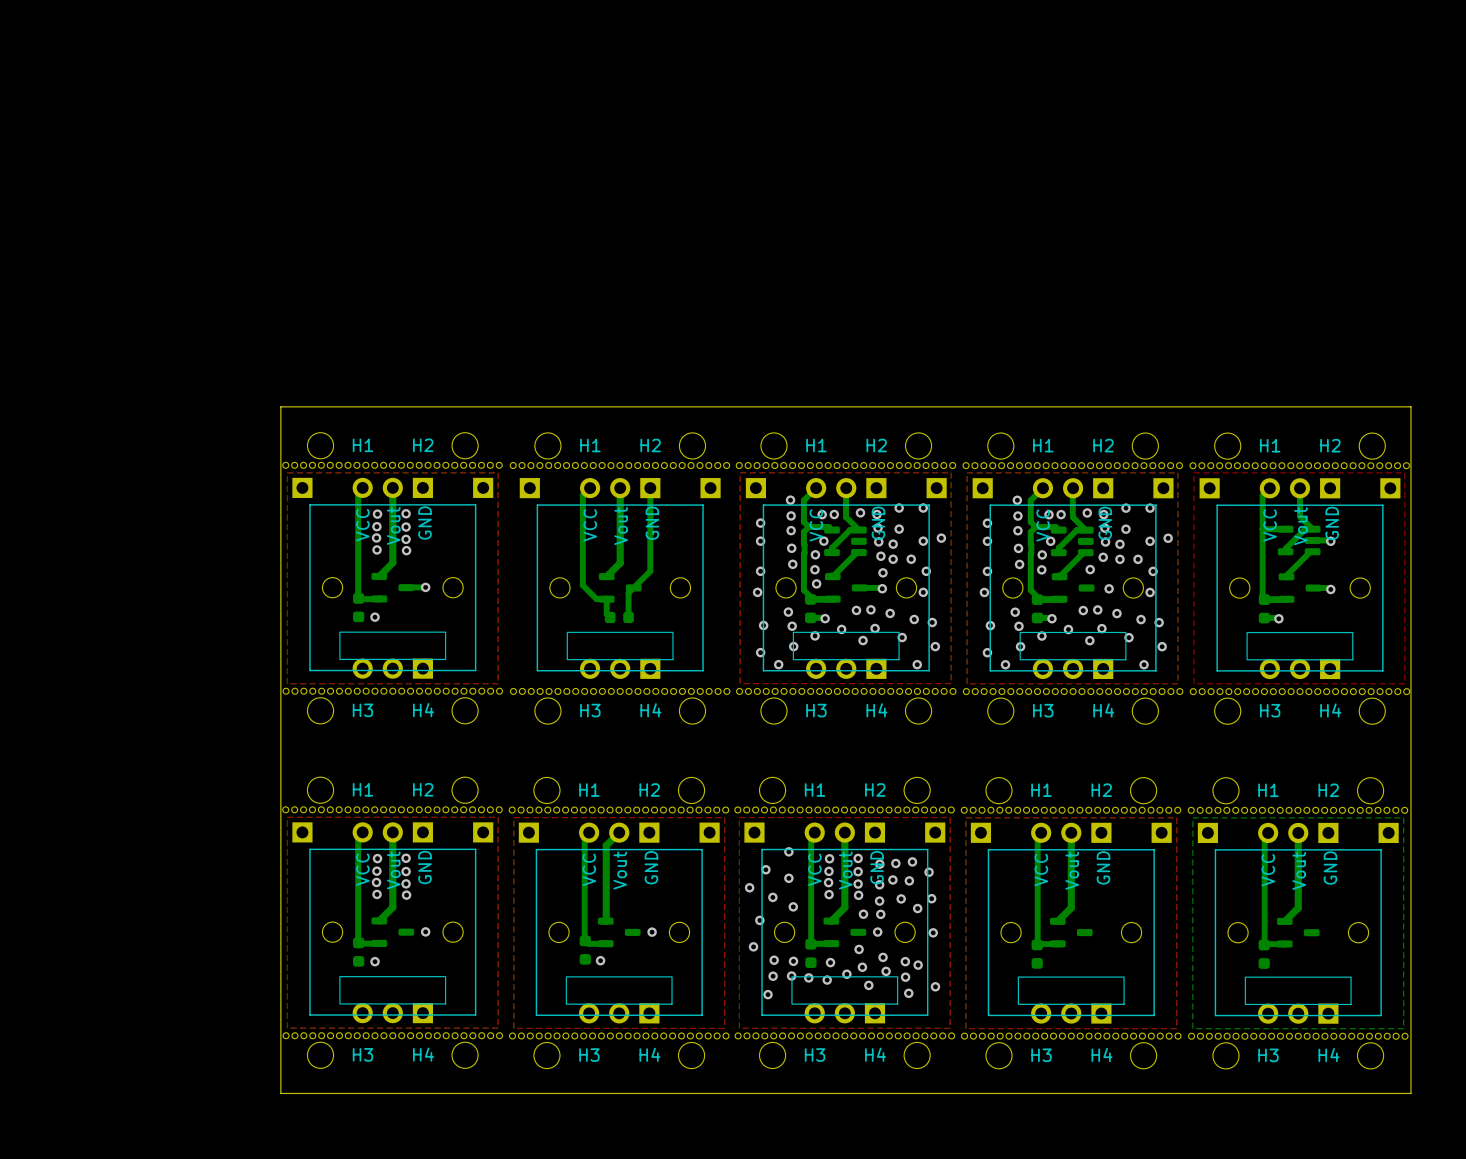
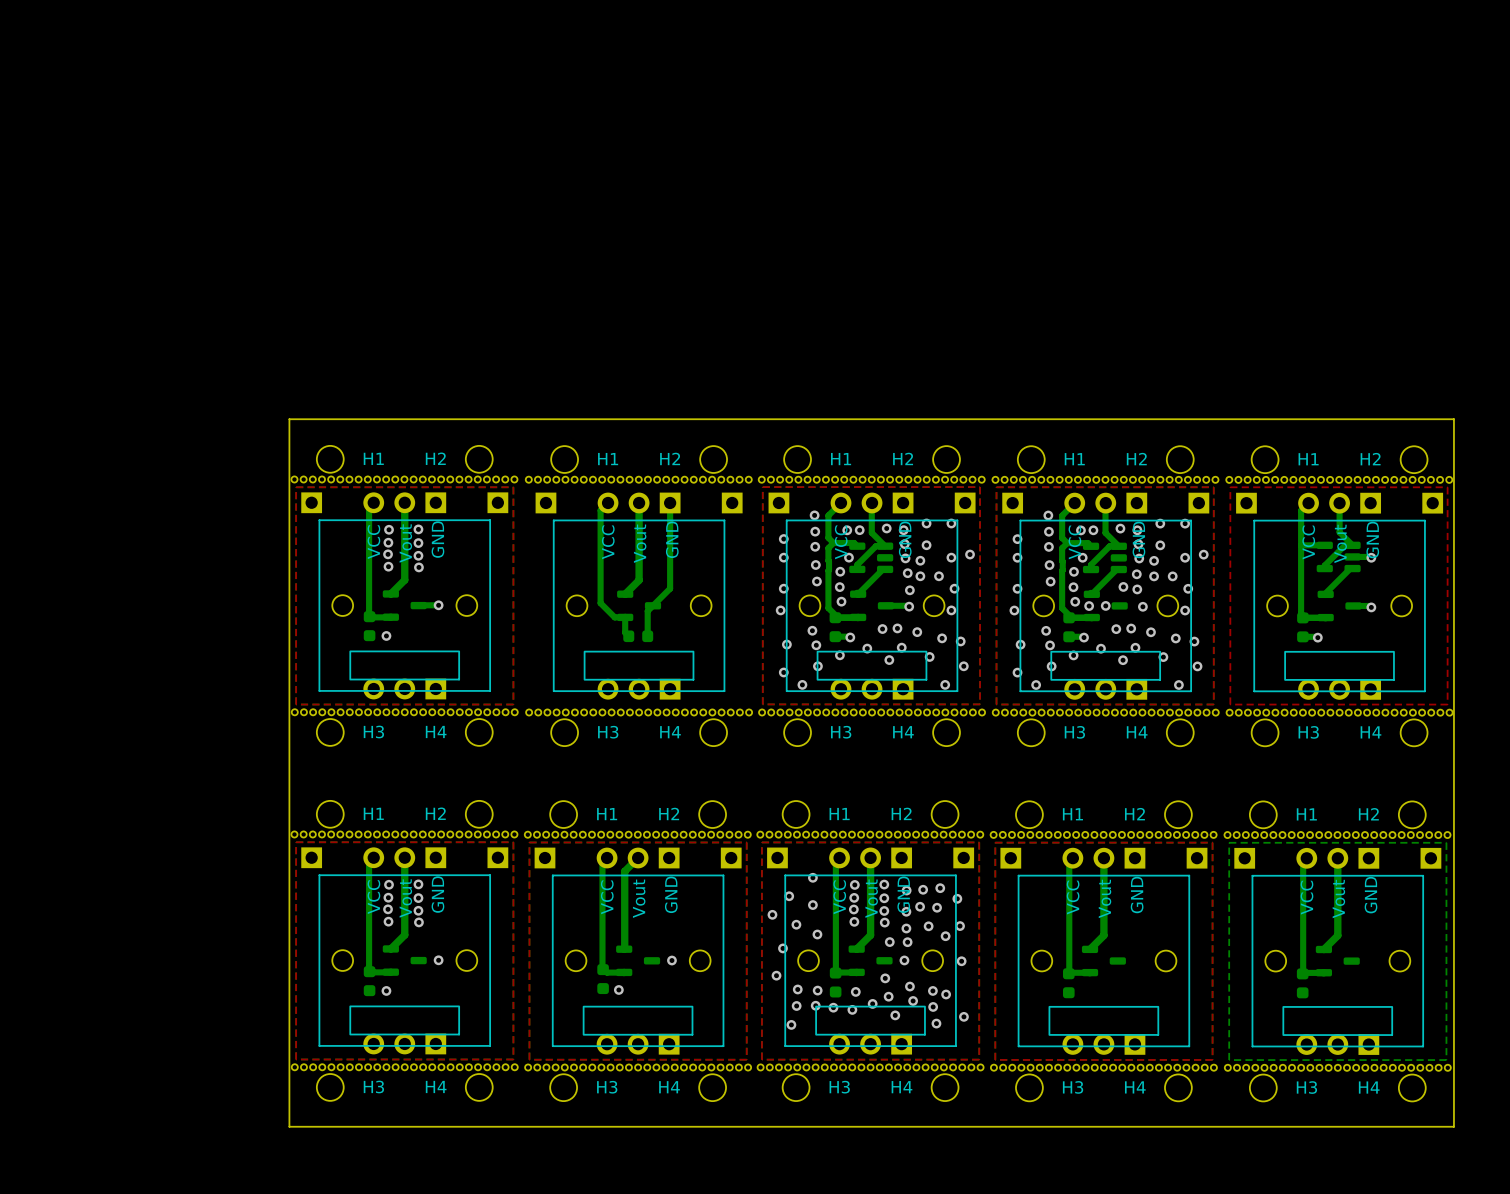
via: none -> (1137, 589)
via: none -> (1075, 601)
via: none -> (1089, 606)
via: none -> (1105, 605)

